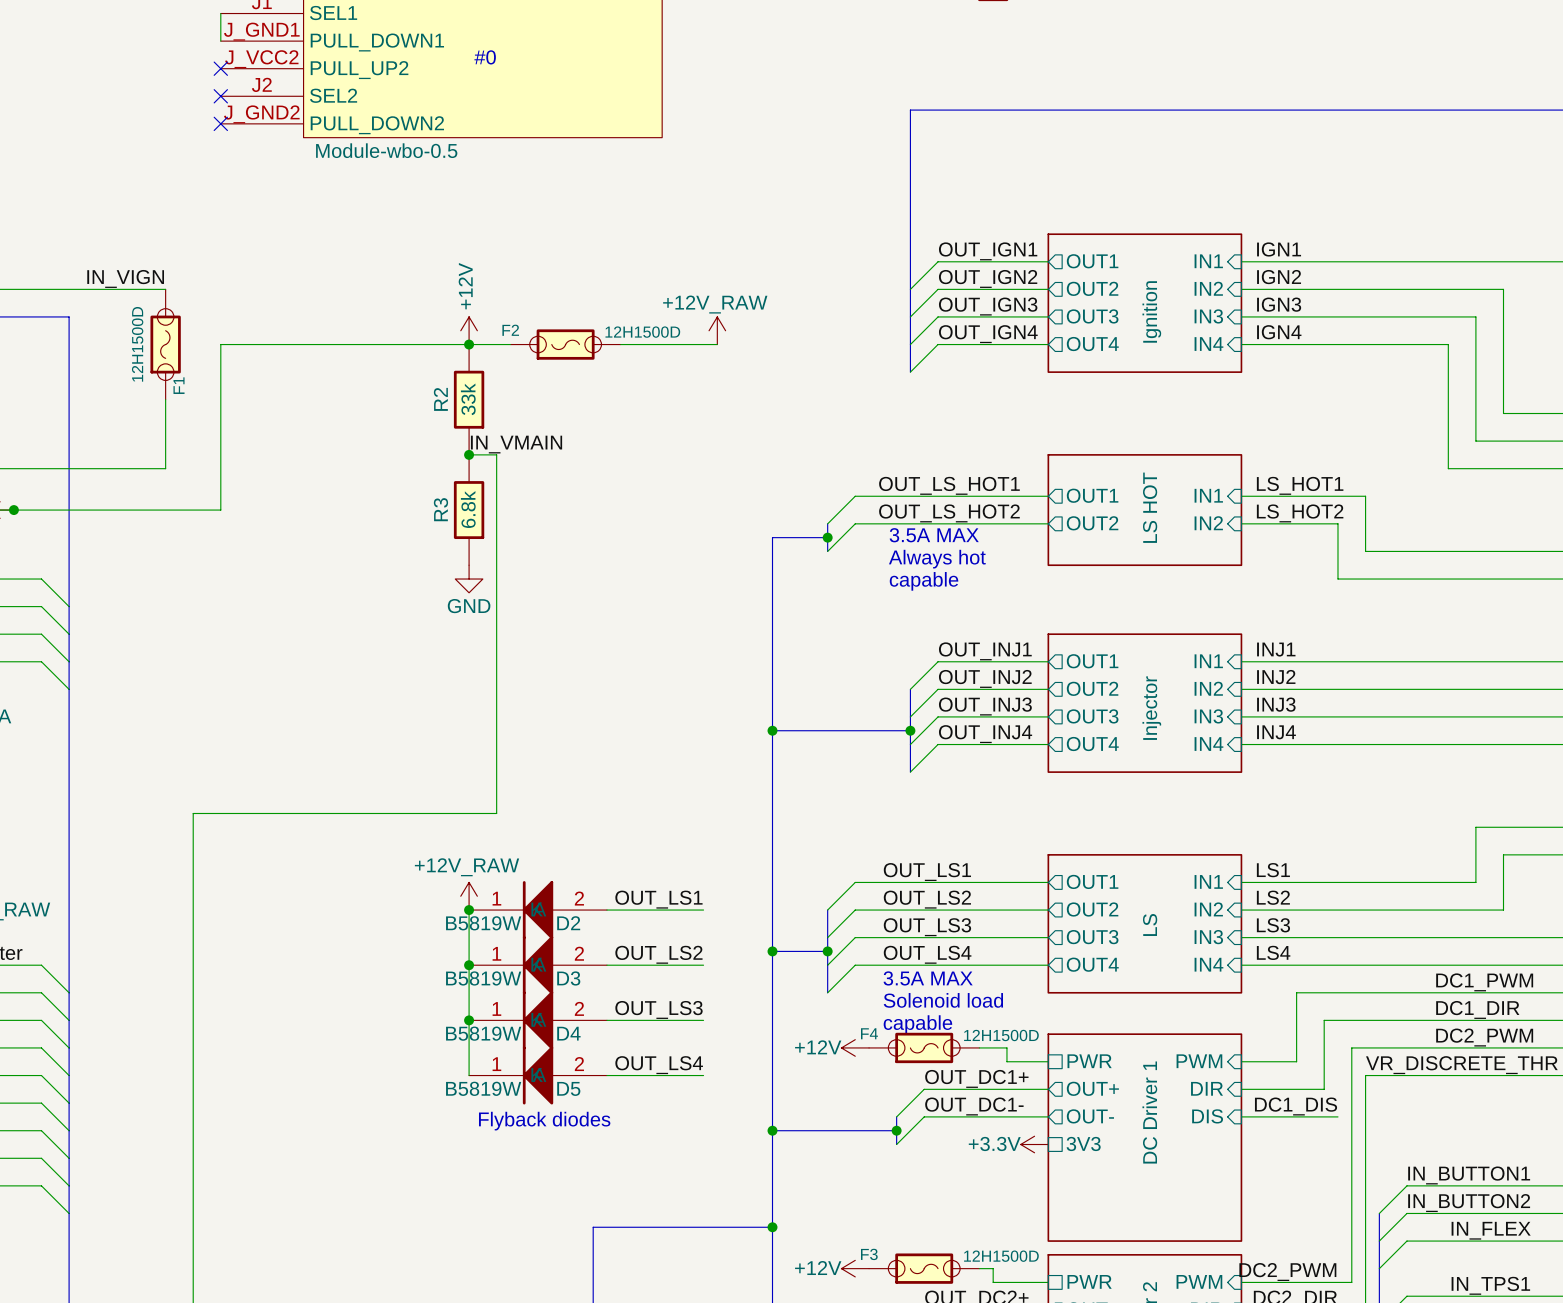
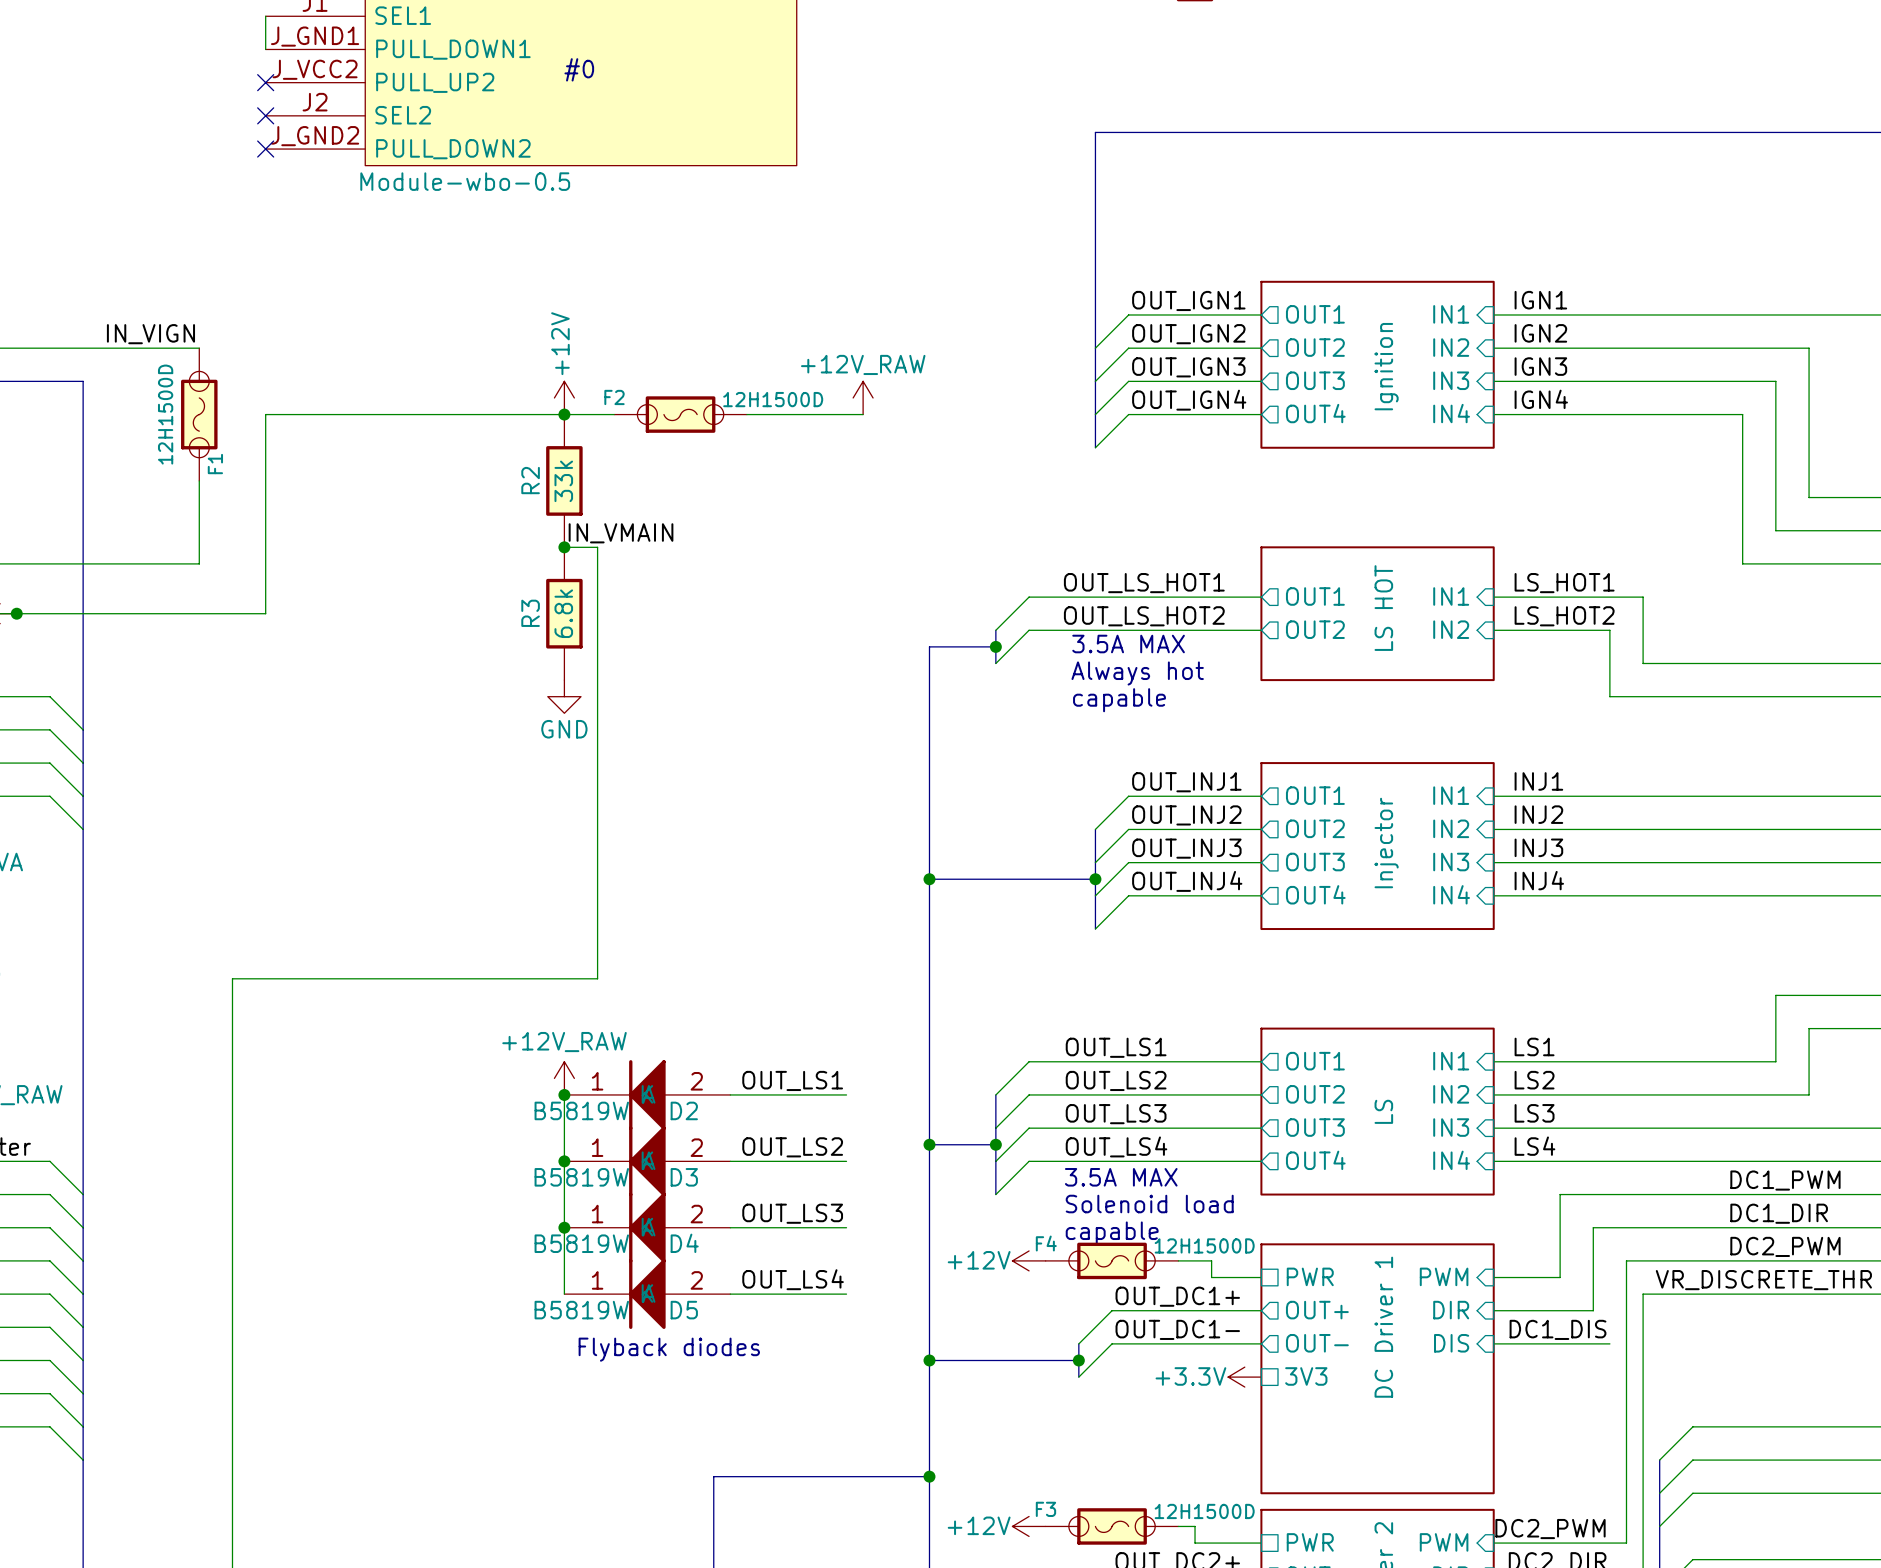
label: IN_BUTTON1 (1469, 1175) -> none
label: IN_BUTTON2 (1469, 1203) -> none
label: IN_FLEX (1491, 1230) -> none
label: IN_TPS1 (1490, 1285) -> none

